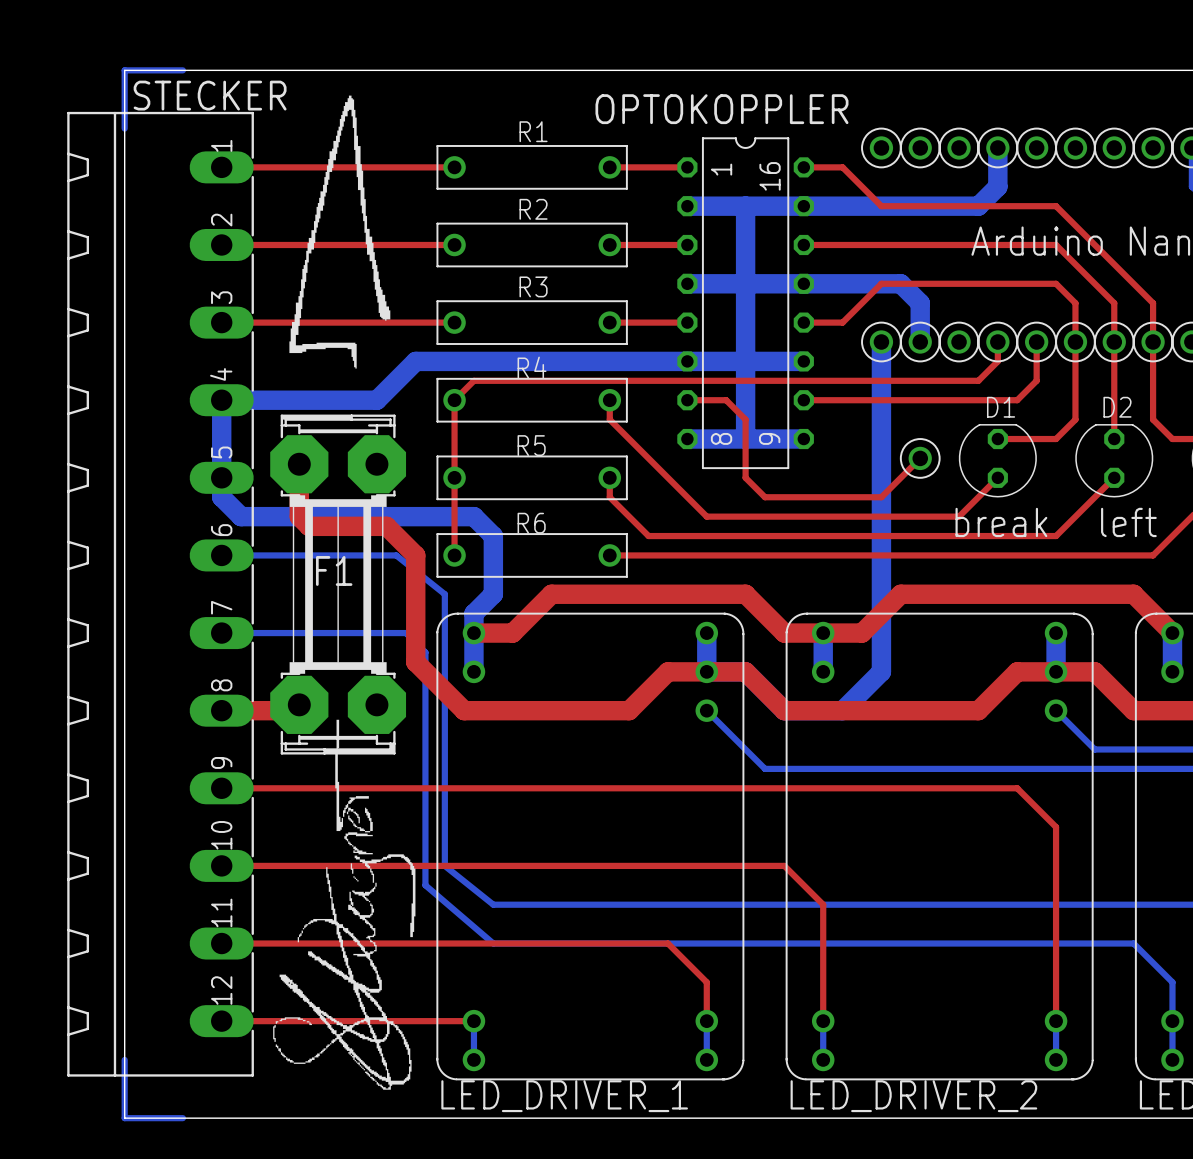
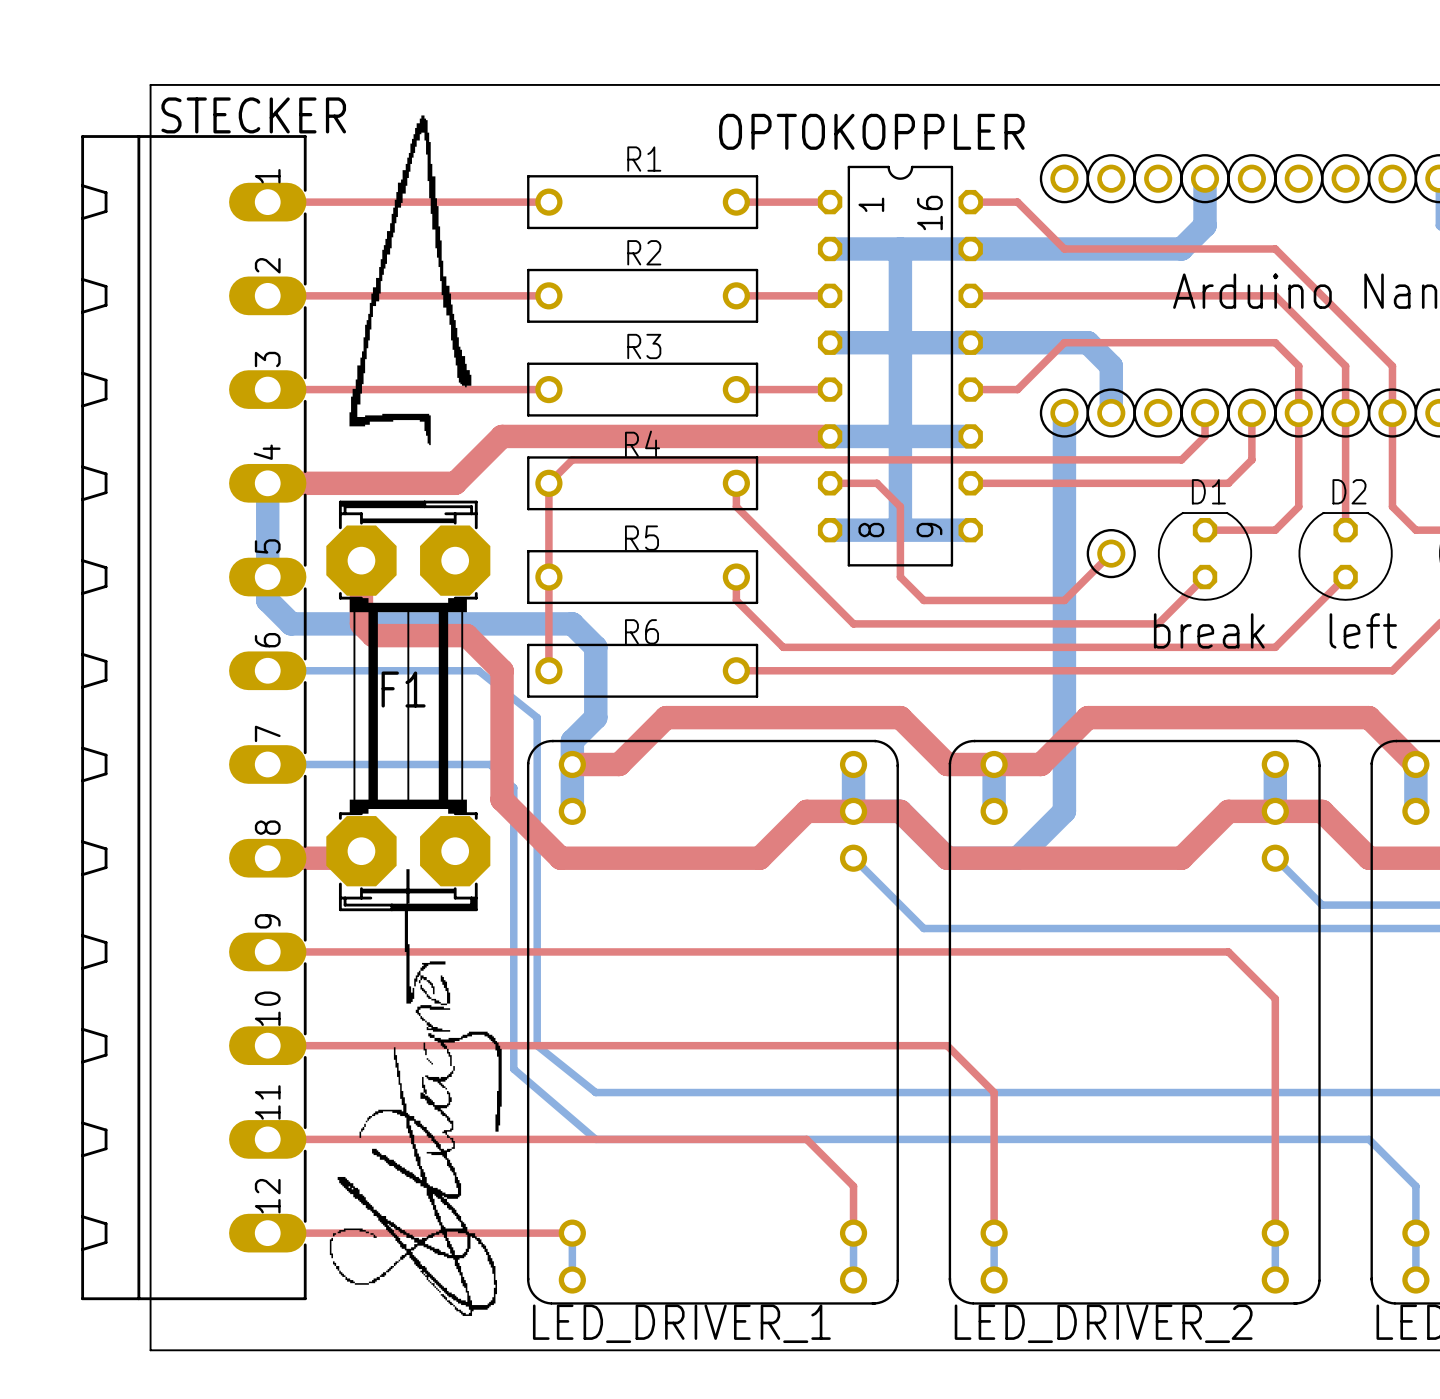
bottom track: (182, 70) (124, 70) (124, 128) -> none
bottom track: (687, 361) (415, 361) (376, 400) (221, 400) -> none
top track: none -> (830, 436) (502, 436) (455, 483) (267, 483)
bottom track: (124, 1059) (124, 1118) (182, 1118) -> none

